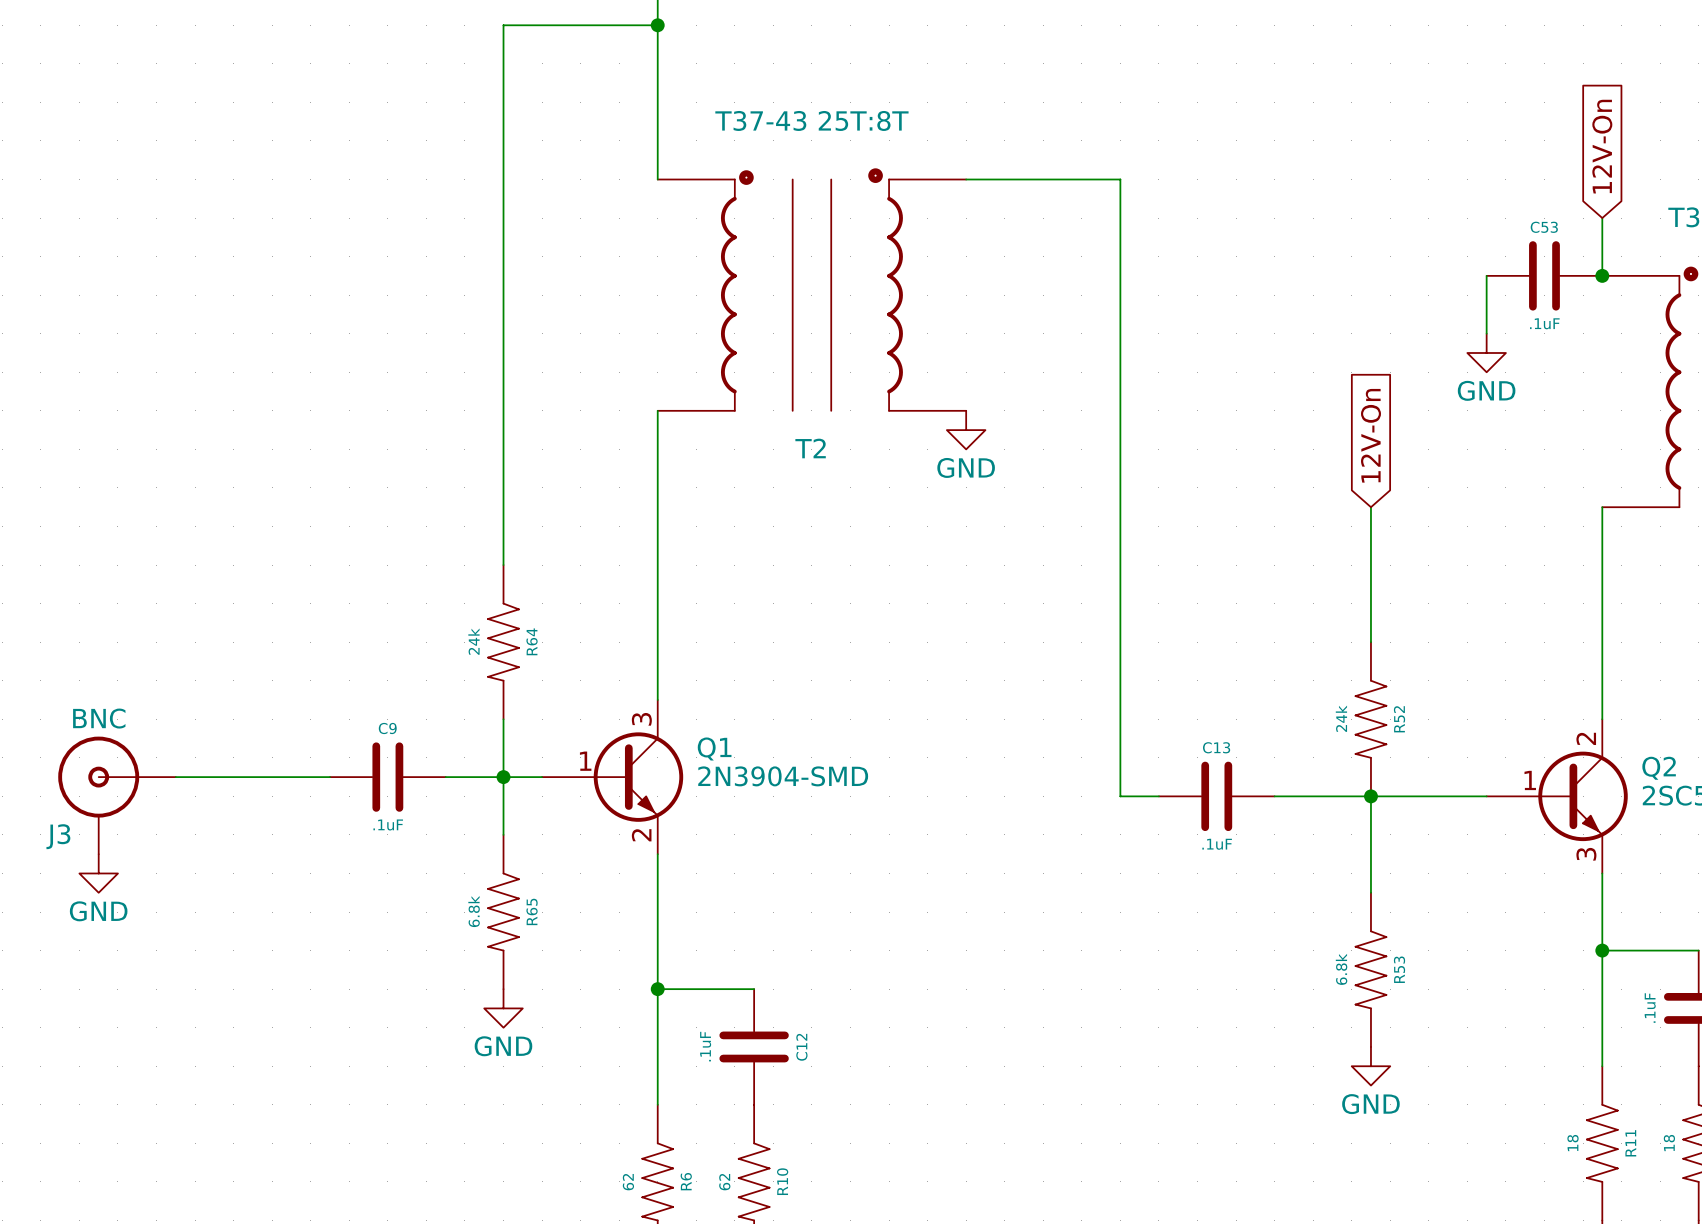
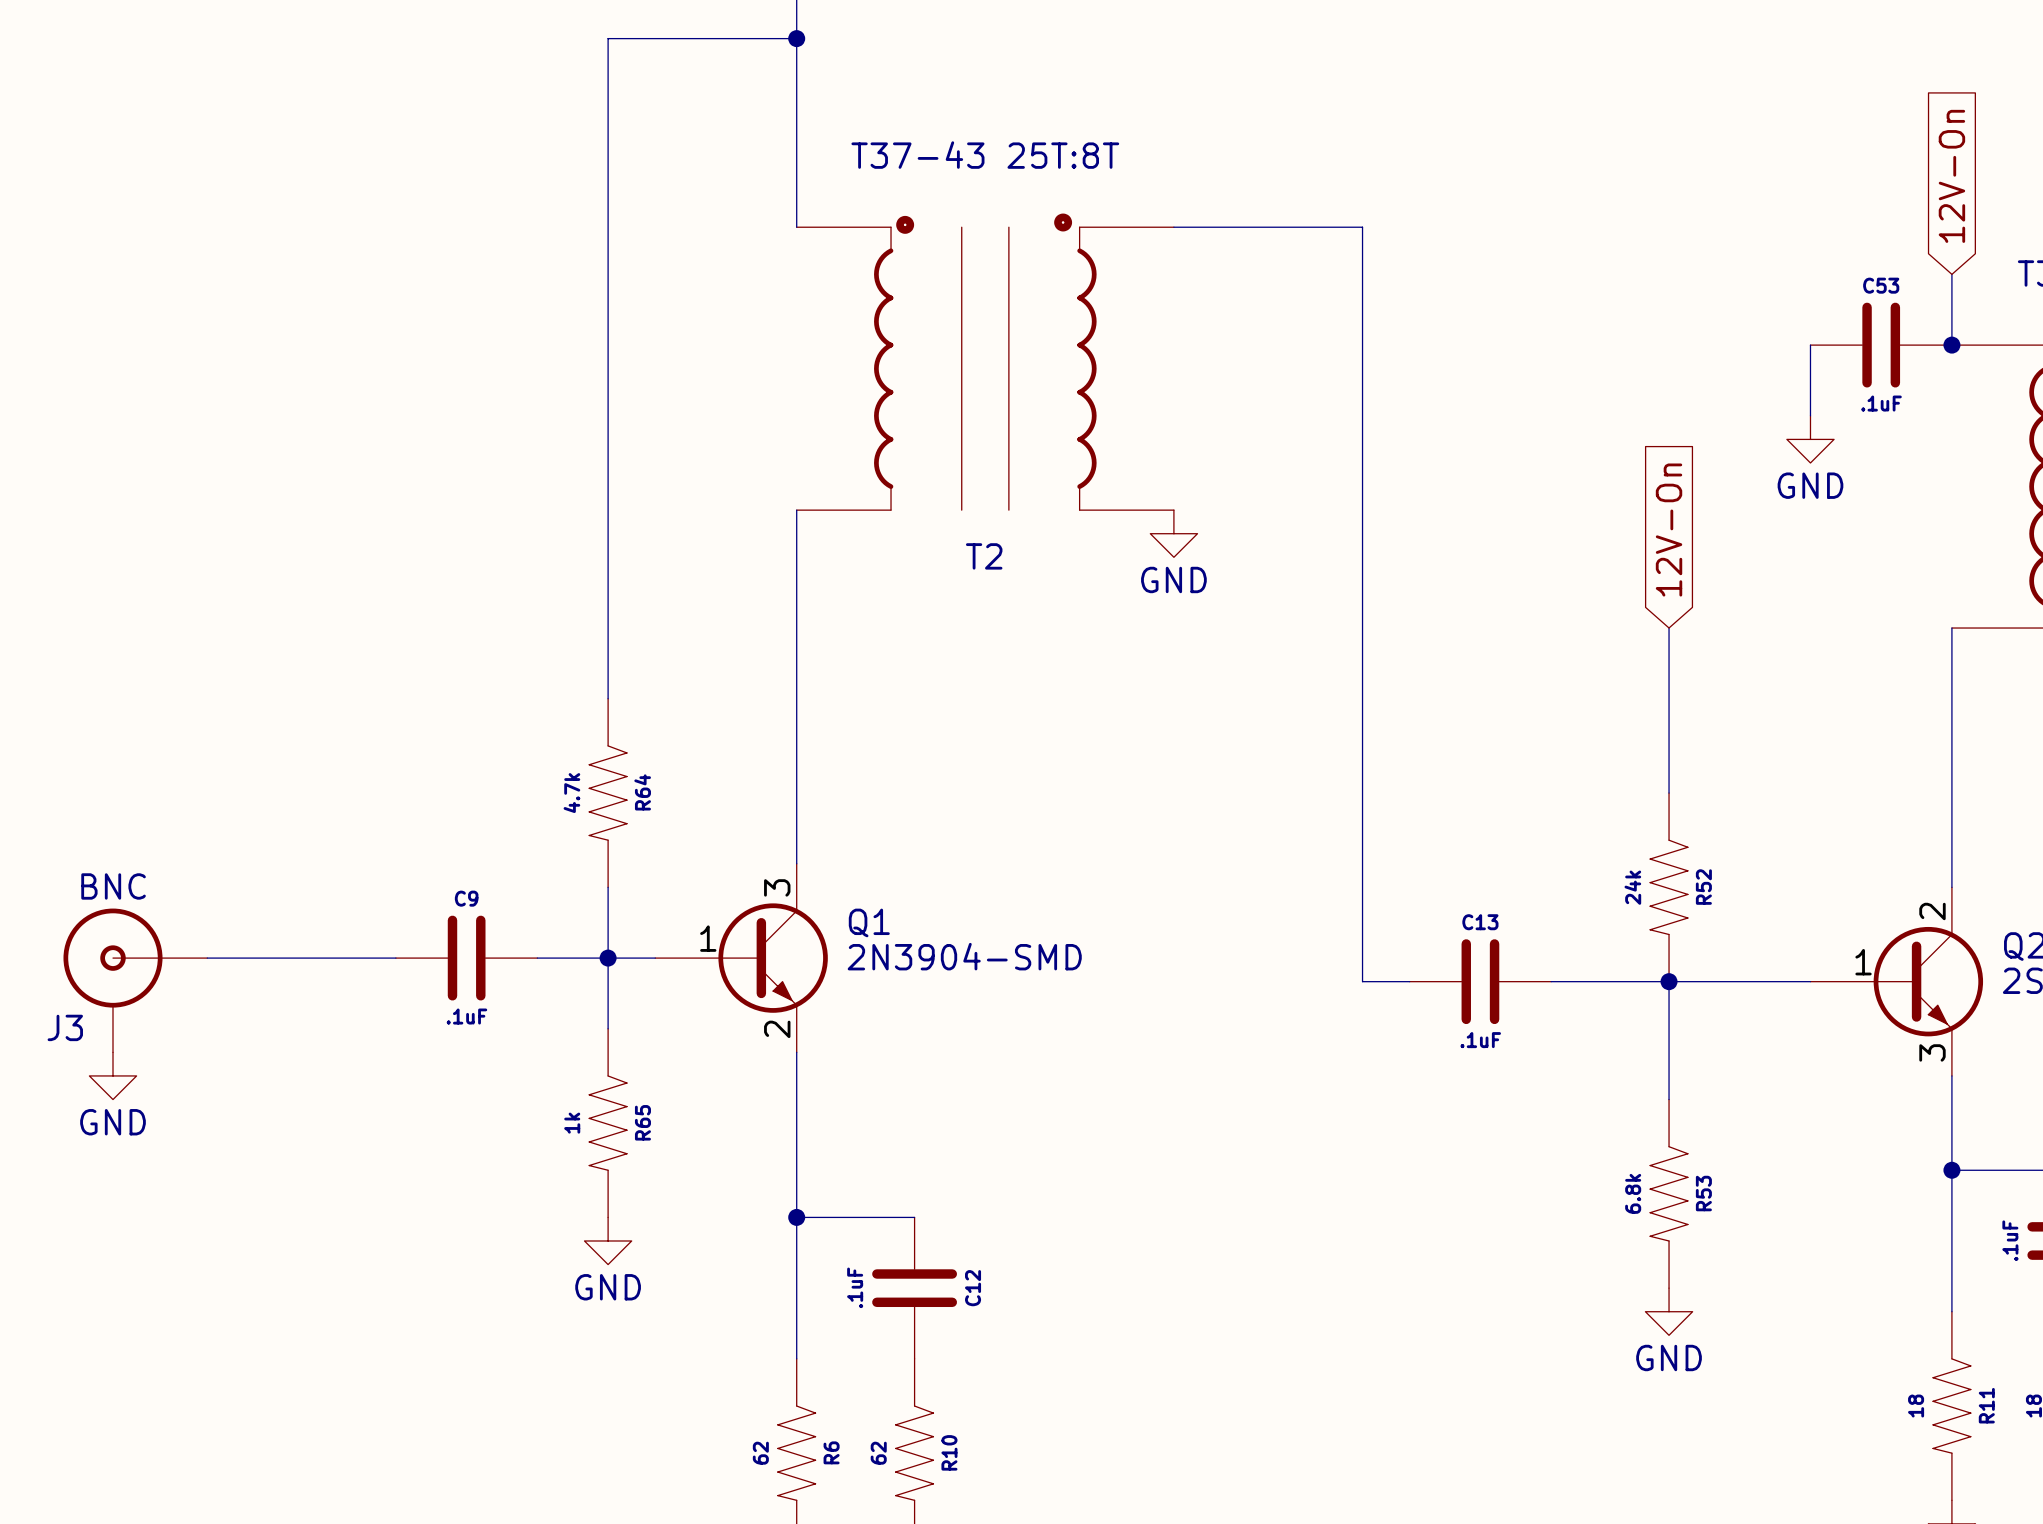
R64 value: 24k (473, 641) -> 4.7k (571, 793)
R65 value: 6.8k (474, 911) -> 1k (572, 1123)

